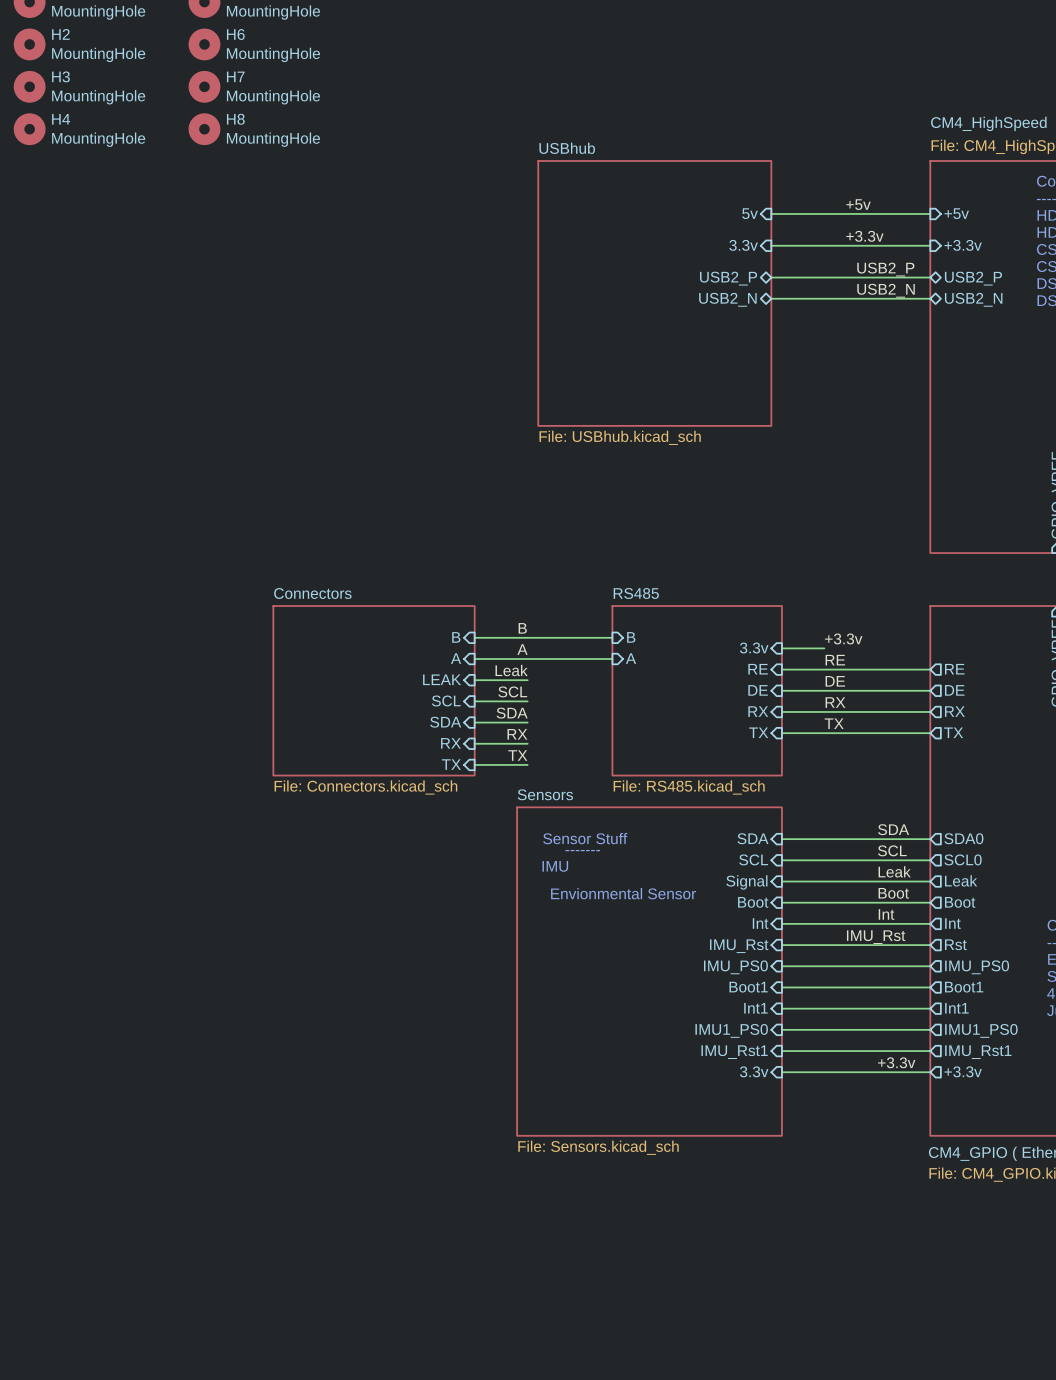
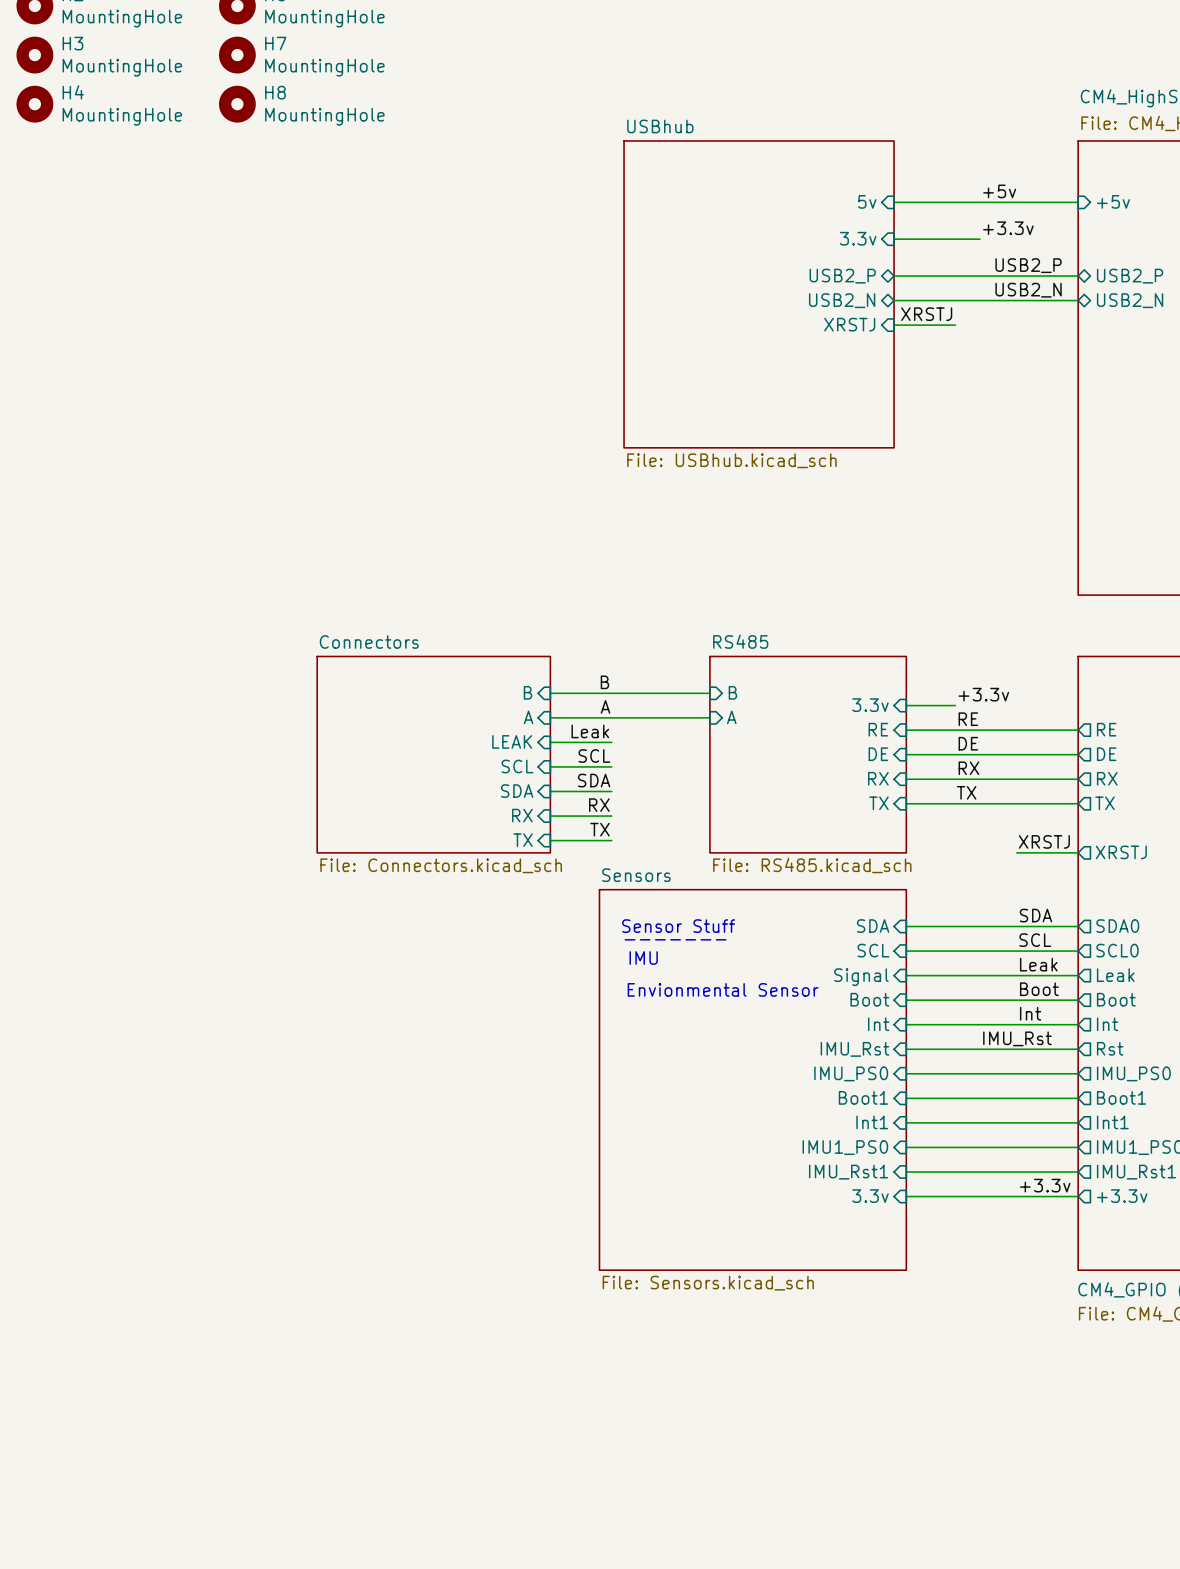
wire: (845, 245) (930, 245) -> none
sheet pin: +3.3v (963, 245) -> none
label: none -> XRSTJ (926, 314)
sheet pin: none -> XRSTJ (849, 324)
wire: none -> (894, 325) (955, 325)
label: none -> XRSTJ (1044, 841)
wire: none -> (1016, 852) (1078, 852)
sheet pin: none -> XRSTJ (1121, 852)

